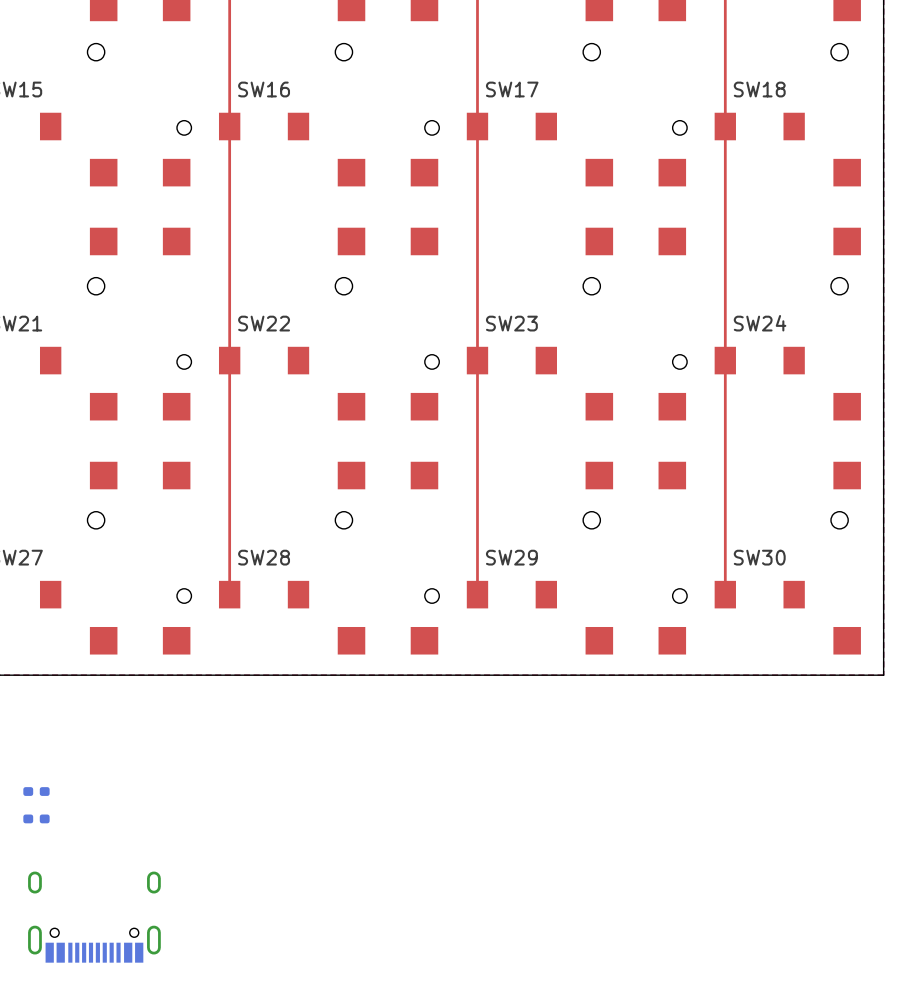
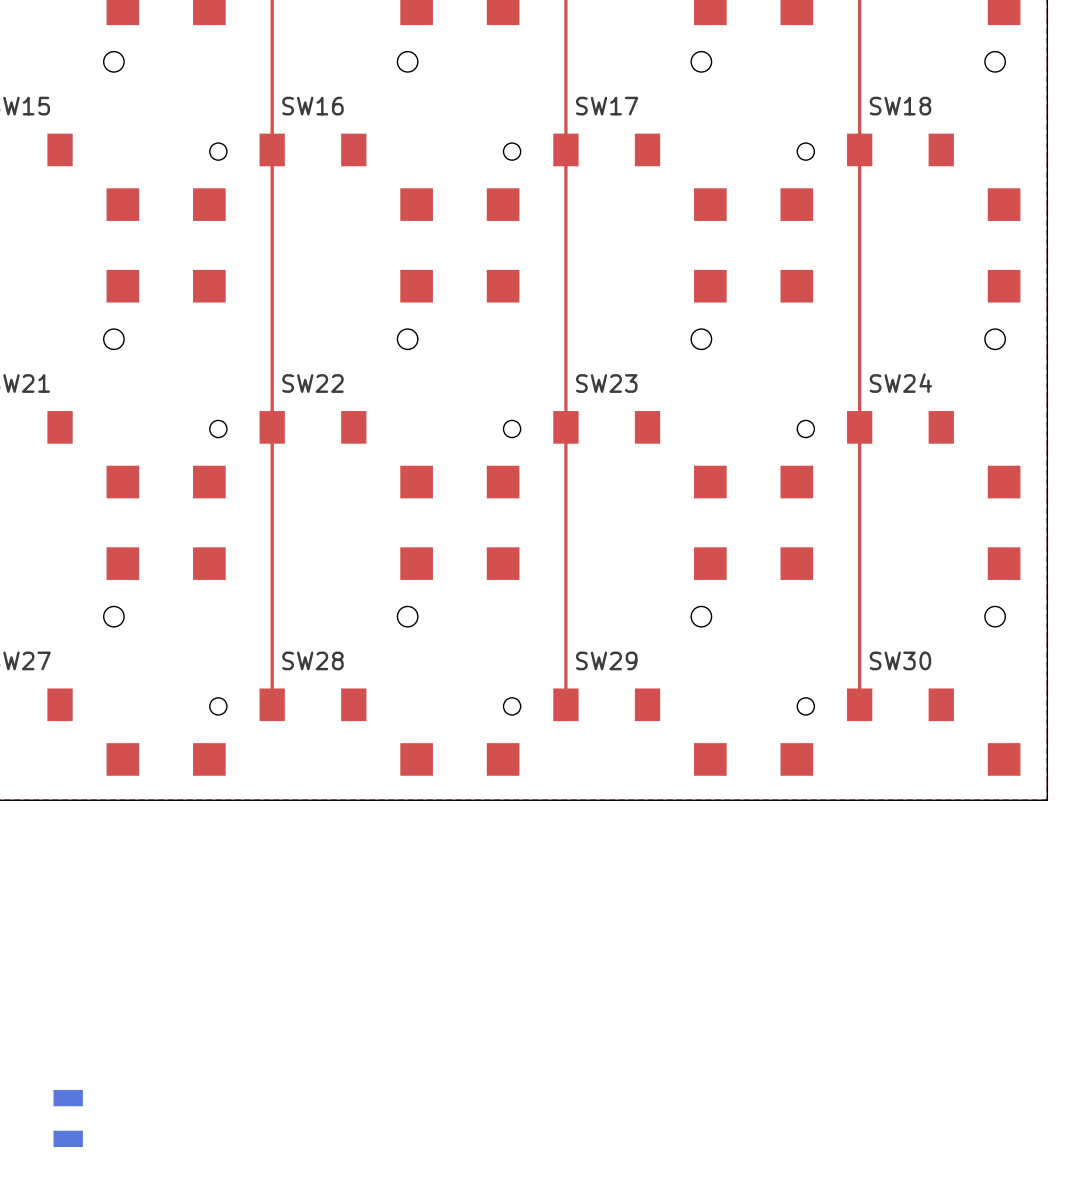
part: (36, 791) -> none
part: (36, 818) -> none
part: (94, 917) -> none
part: none -> (68, 1118)

